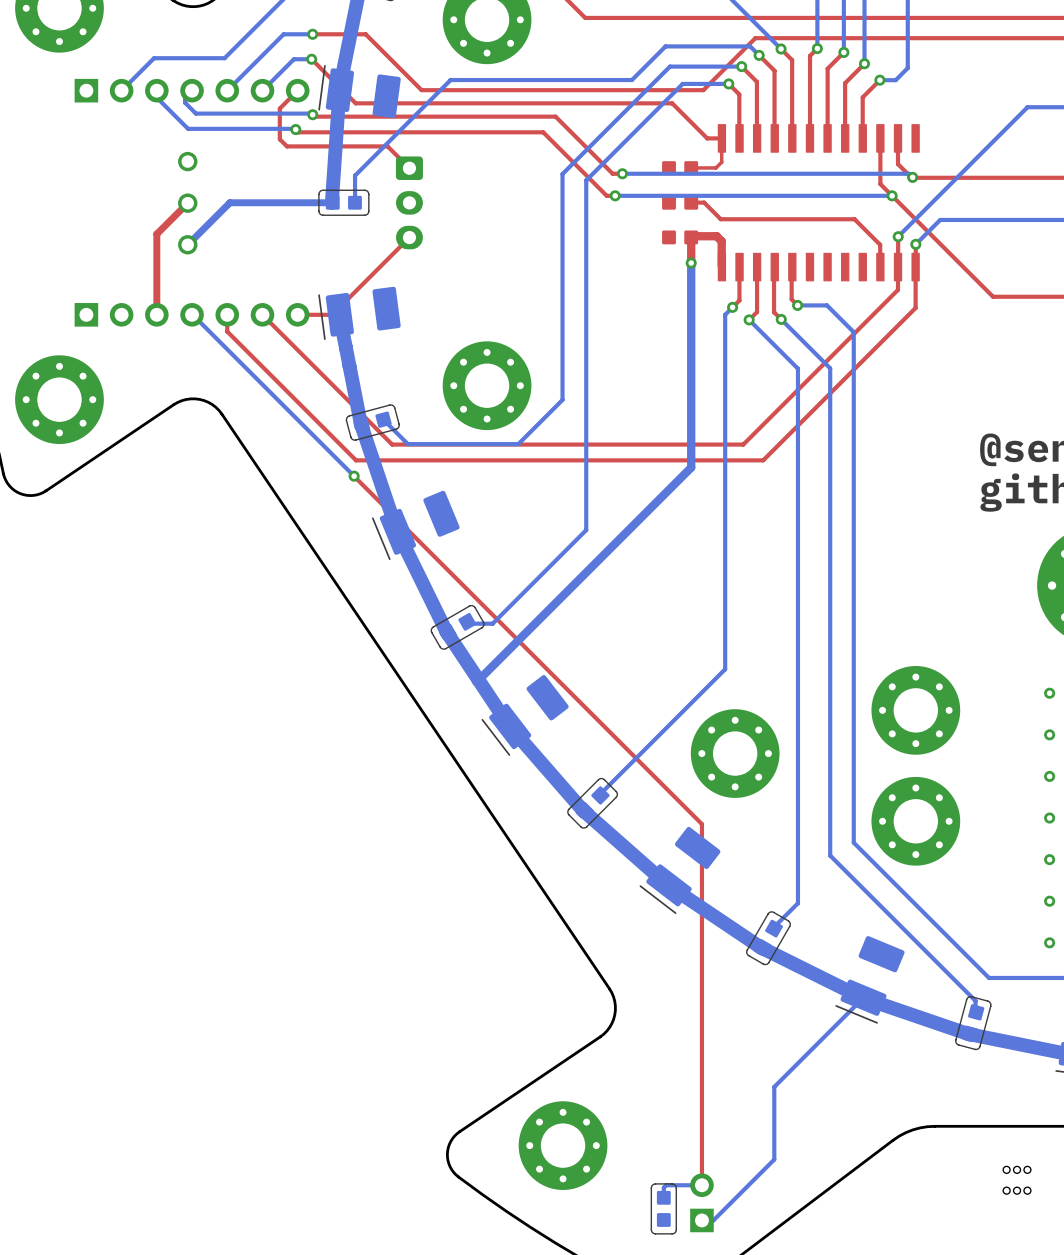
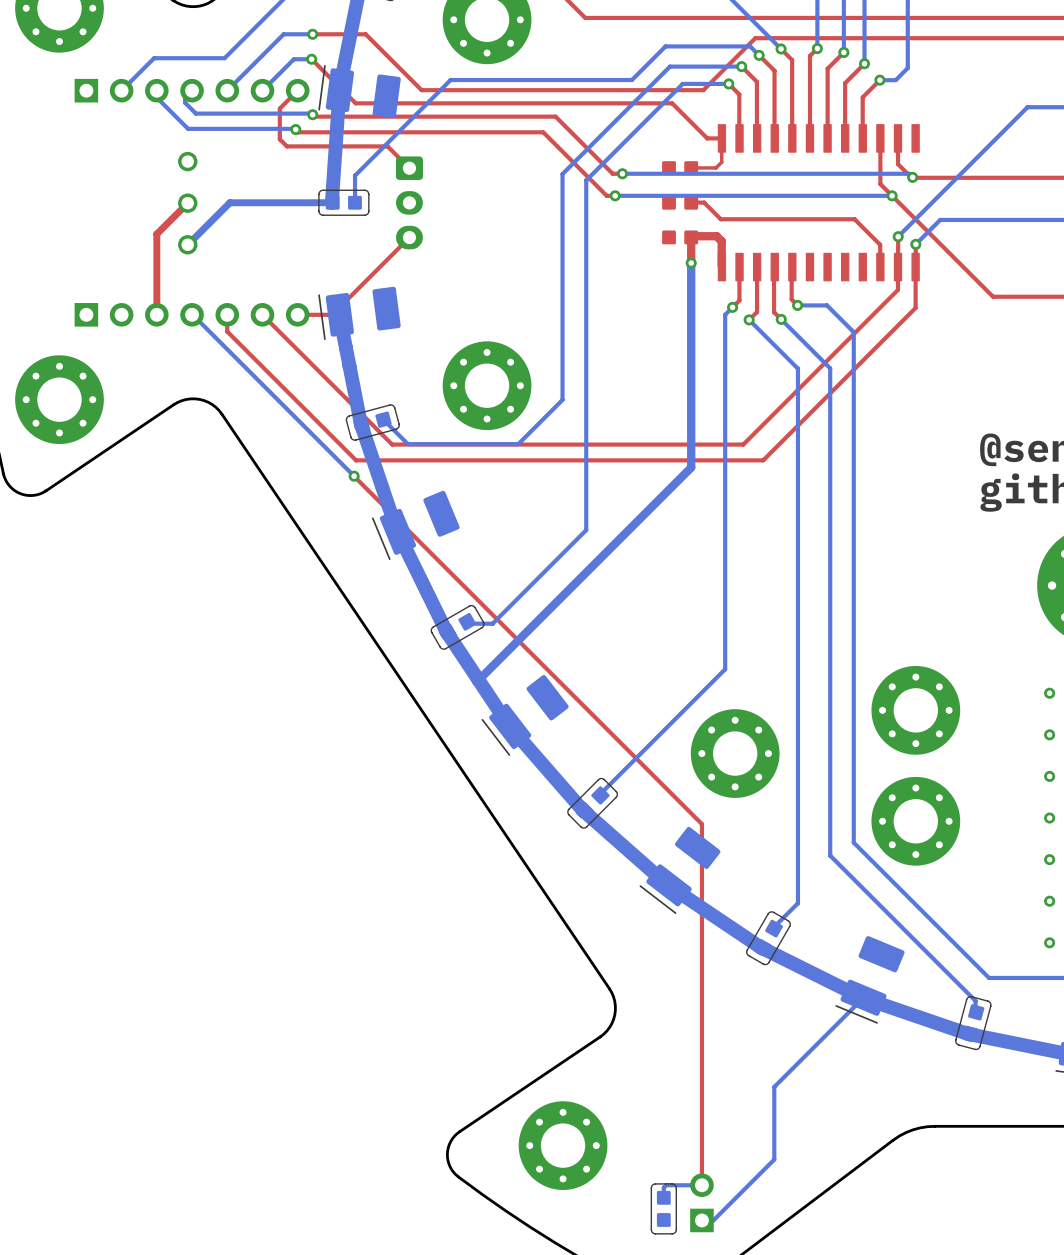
part: (1017, 1180) -> none

